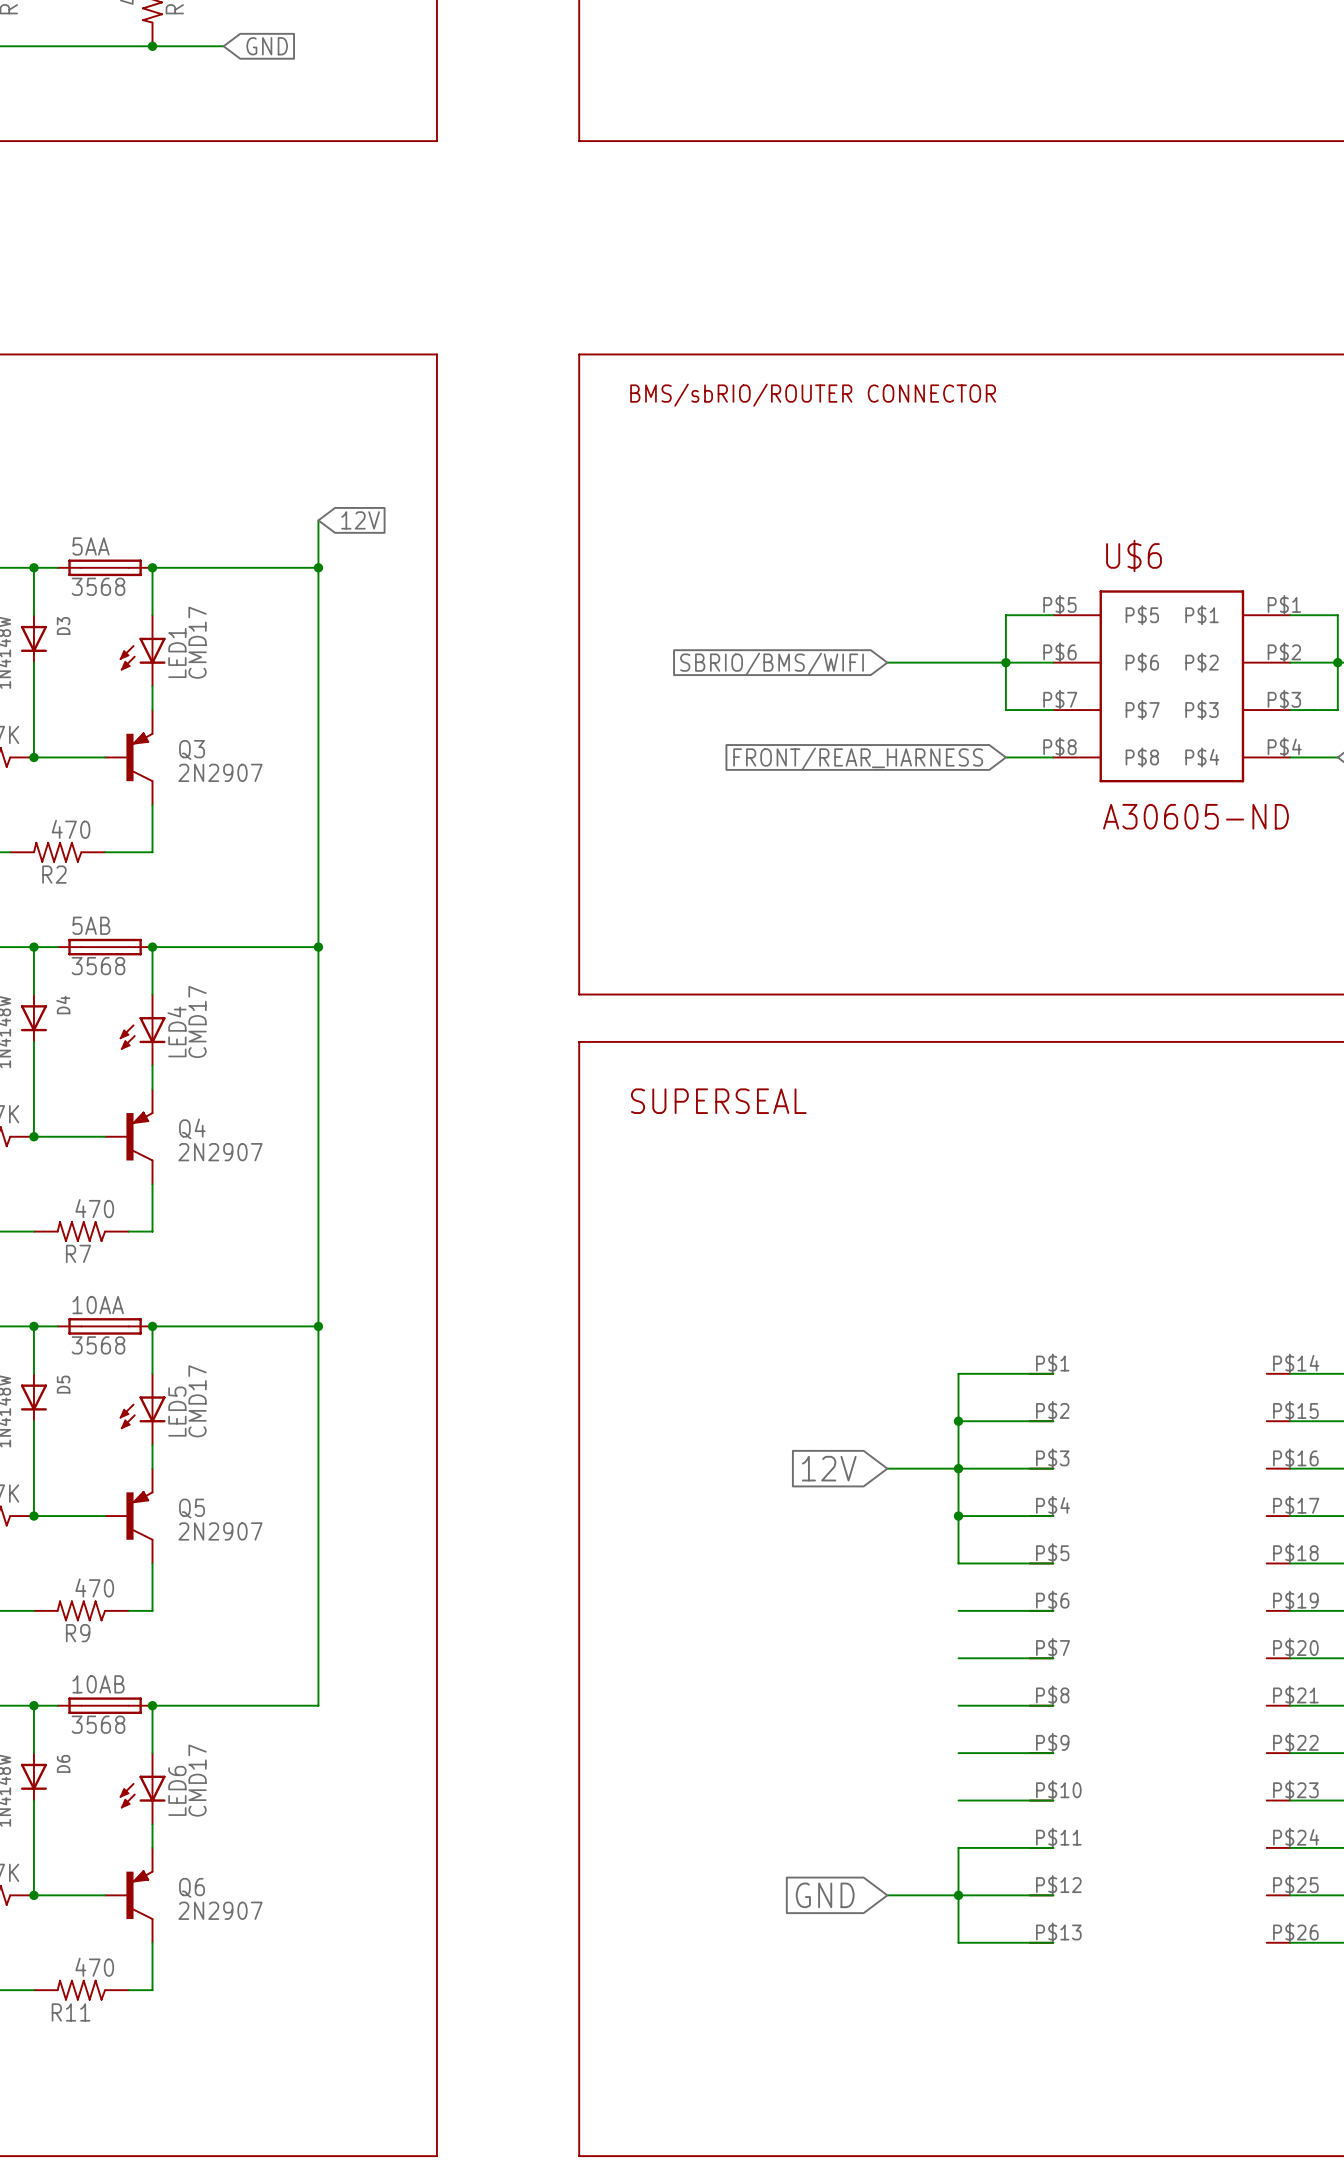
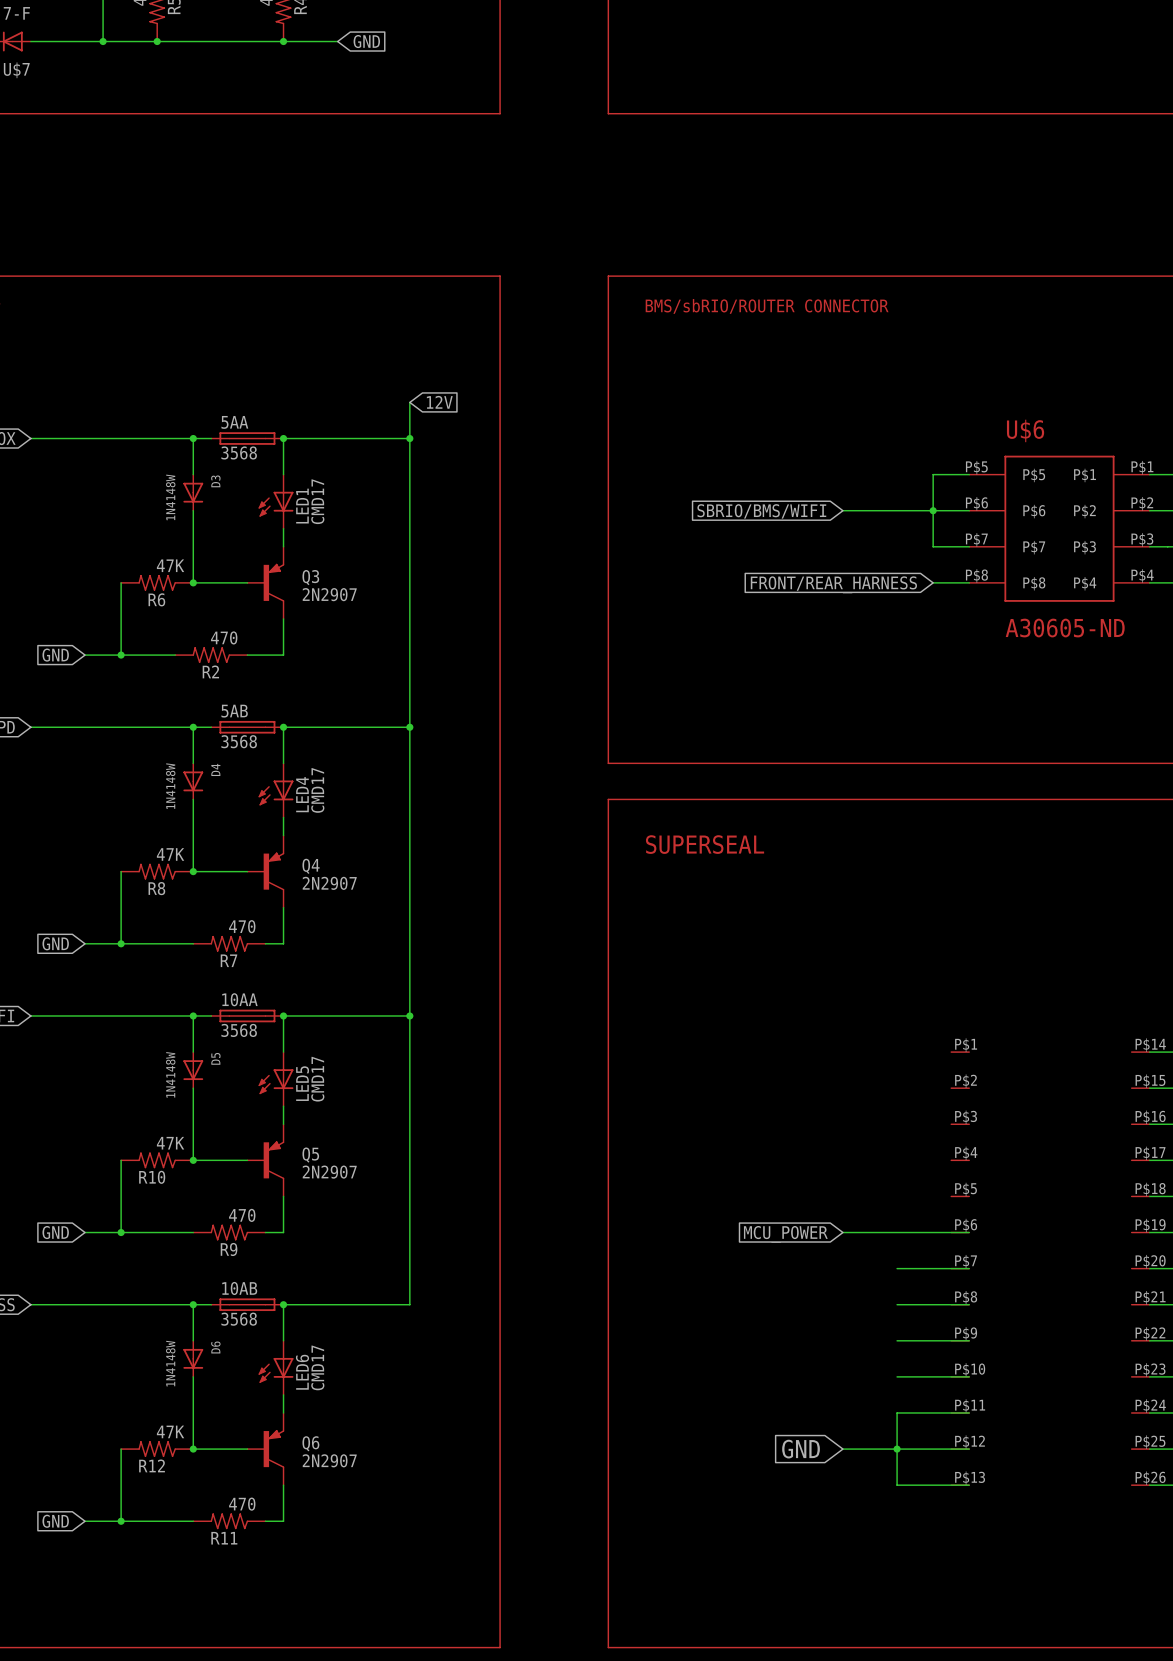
wire: (1053, 1373) (958, 1373) (958, 1563) (1053, 1563) -> none
wire: (958, 1421) (1053, 1421) -> none
junction: (958, 1421) -> none
global label: 12V (829, 1468) -> none
wire: (887, 1468) (1053, 1468) -> none
junction: (958, 1468) -> none
wire: (958, 1516) (1053, 1516) -> none
junction: (958, 1516) -> none
wire: none -> (842, 1232) (897, 1232)
global label: none -> MCU_POWER (785, 1234)

